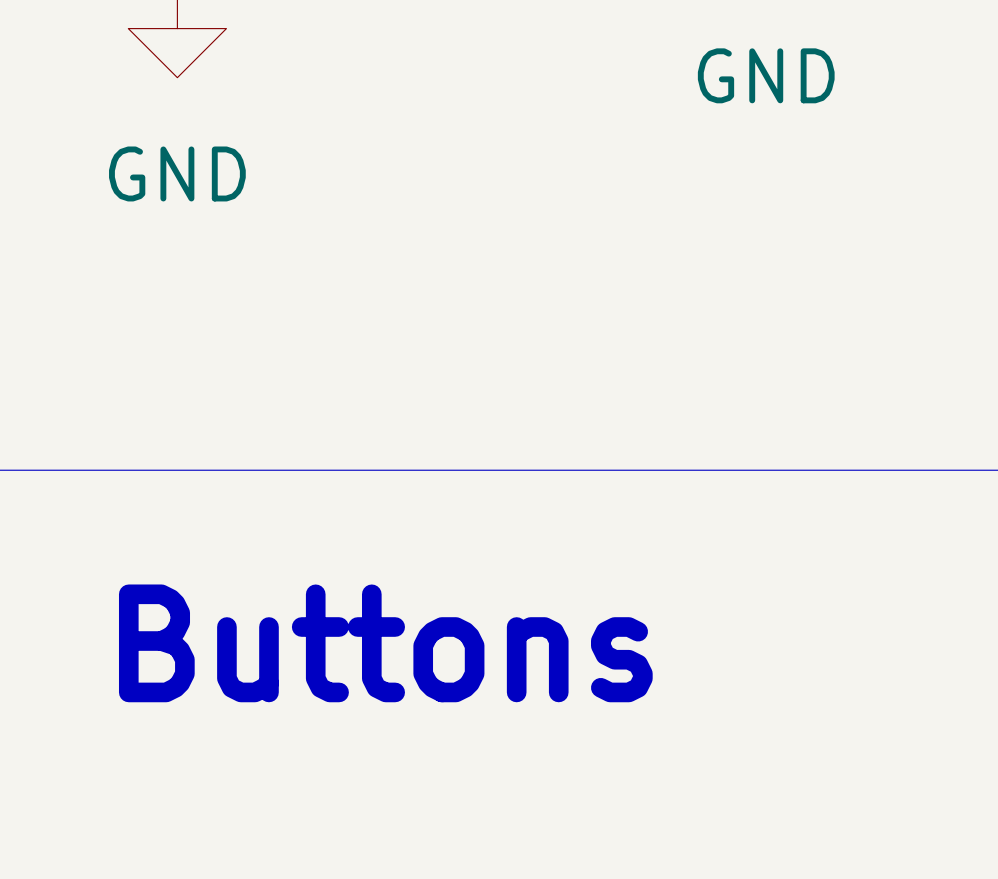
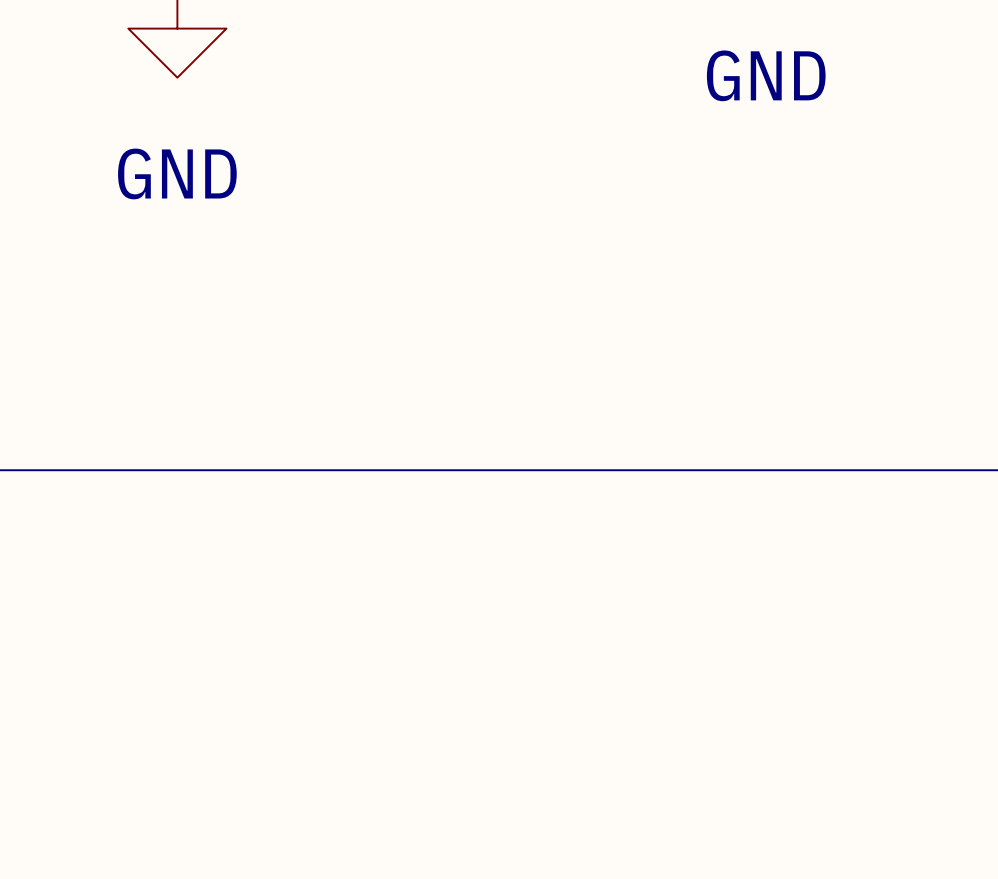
text: Buttons (385, 643) -> none

